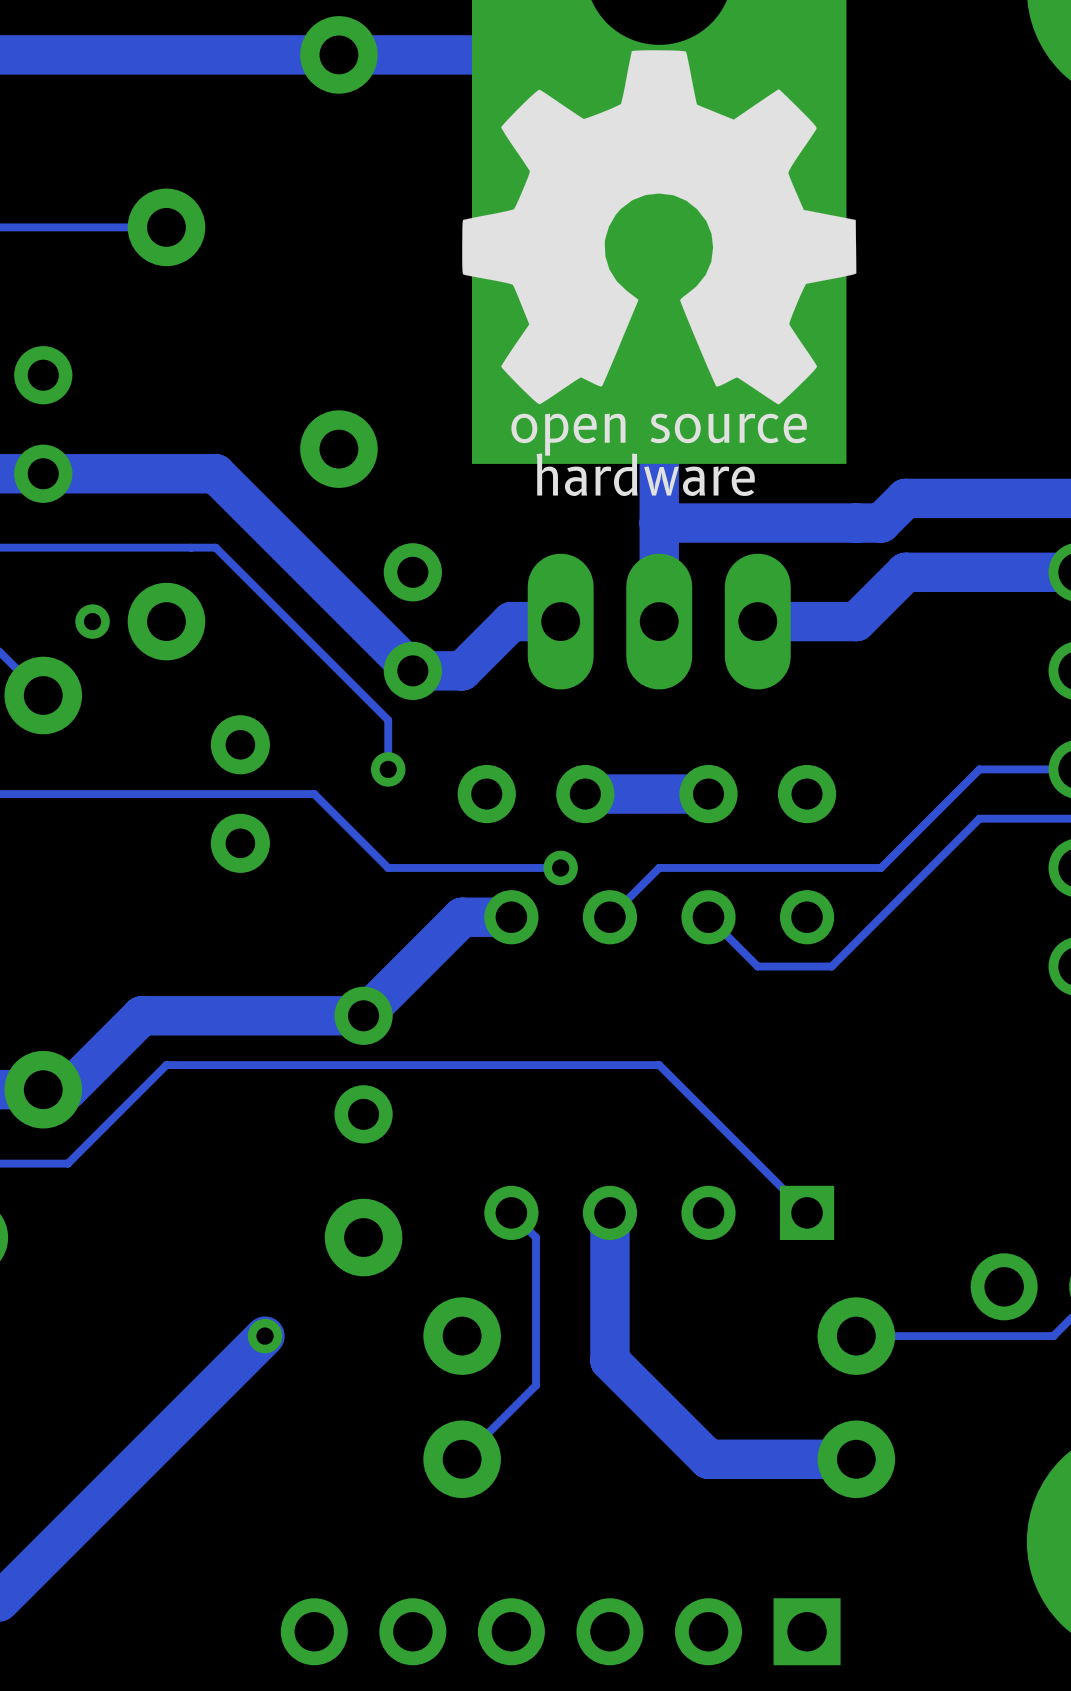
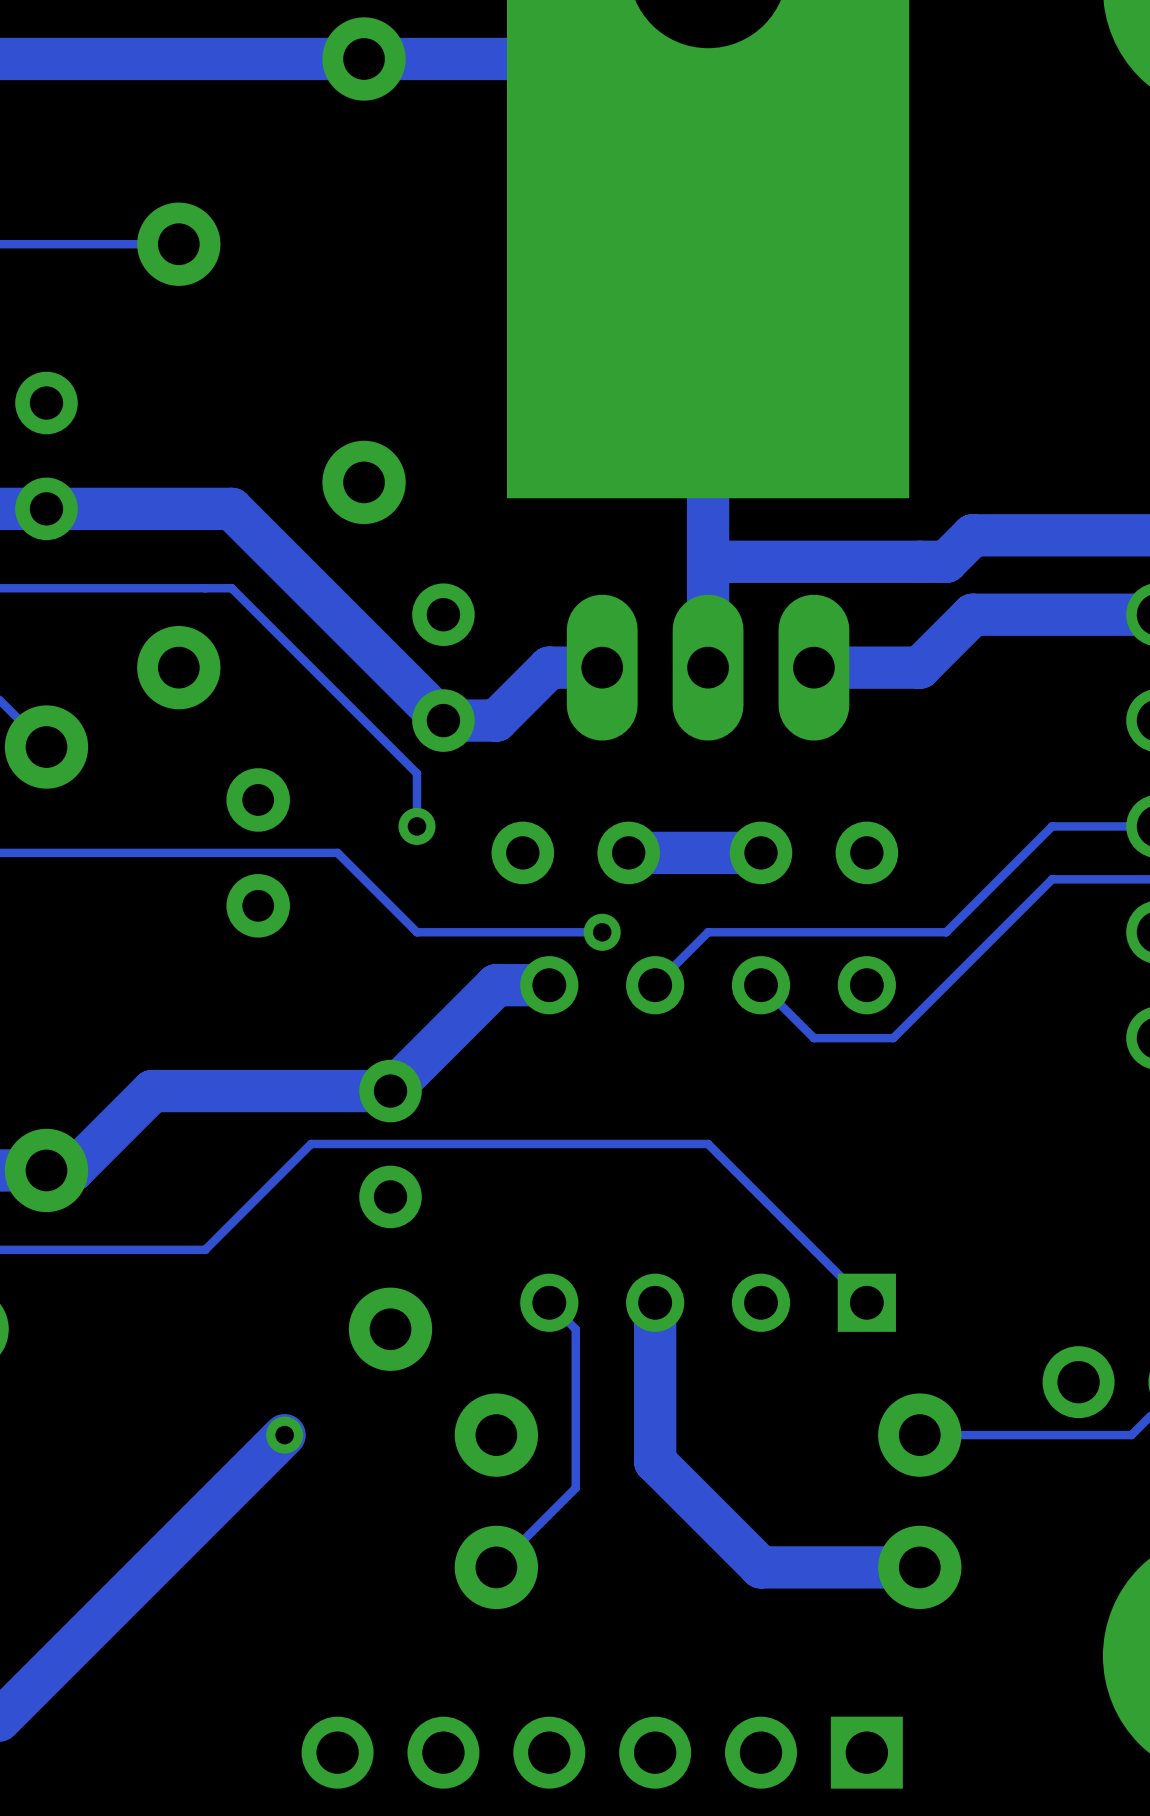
drawing: [462, 50, 857, 405] -> none
text: open source (659, 434) -> none
text: hardware (645, 474) -> none
via: (92, 621) -> none
track: (289, 1065) (166, 1065) (67, 1163) -> (311, 1143) (205, 1249) (72, 1249)

